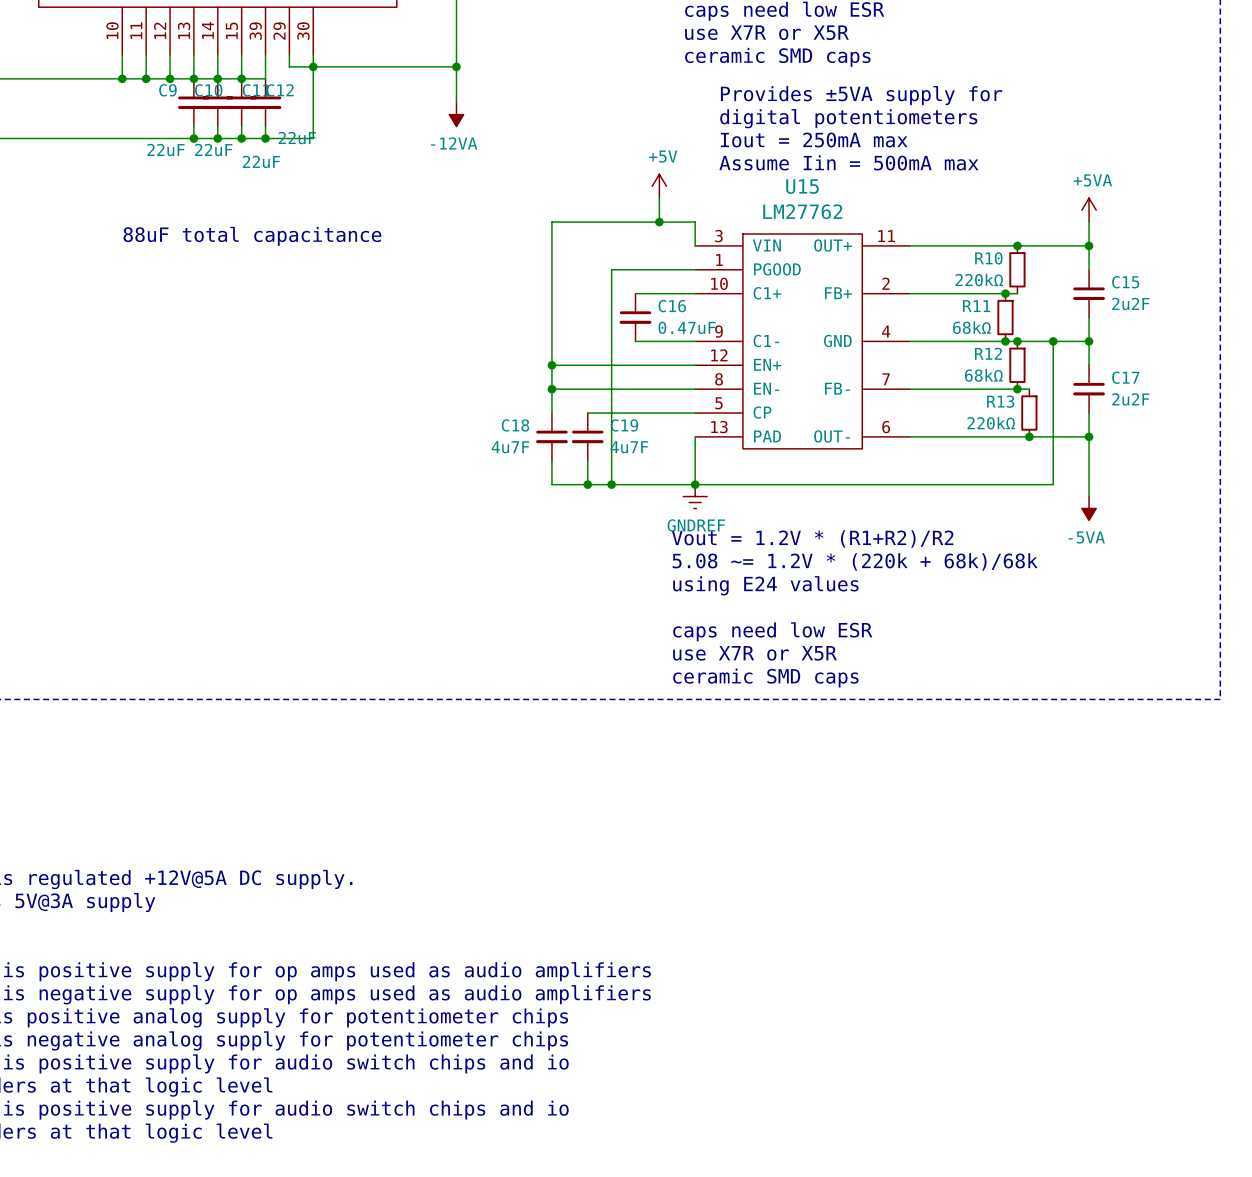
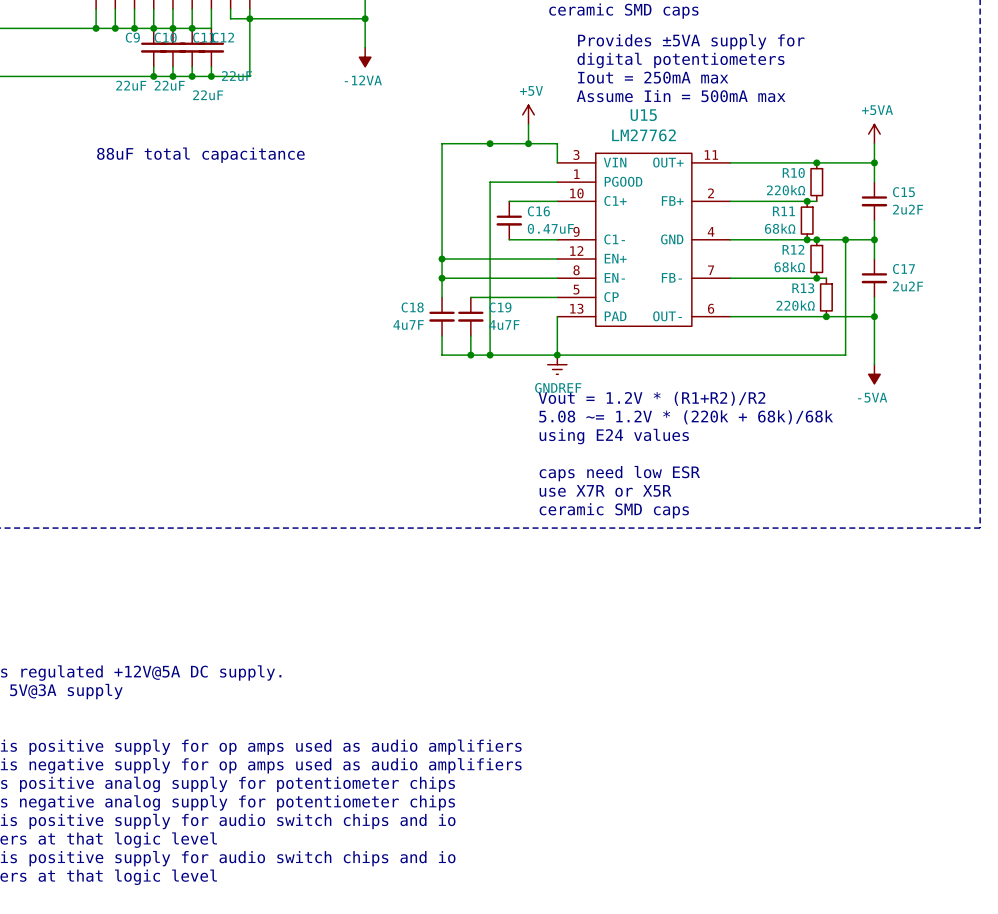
junction: none -> (490, 143)

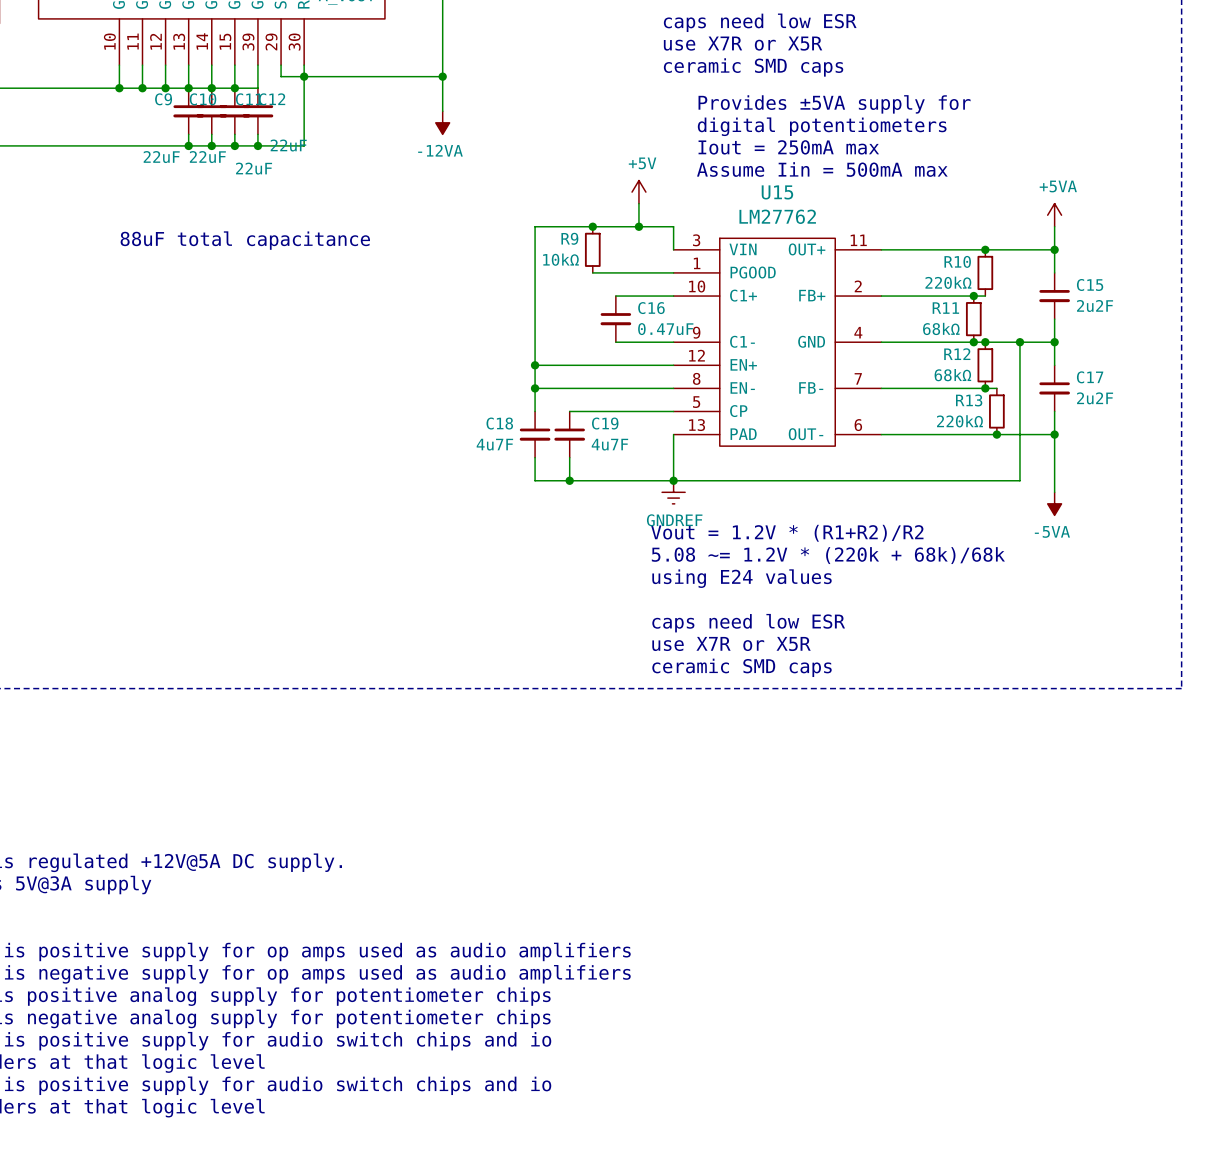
R9: none -> 10kΩ (592, 249)
wire: (490, 182) (490, 355) -> none
junction: (490, 355) -> none

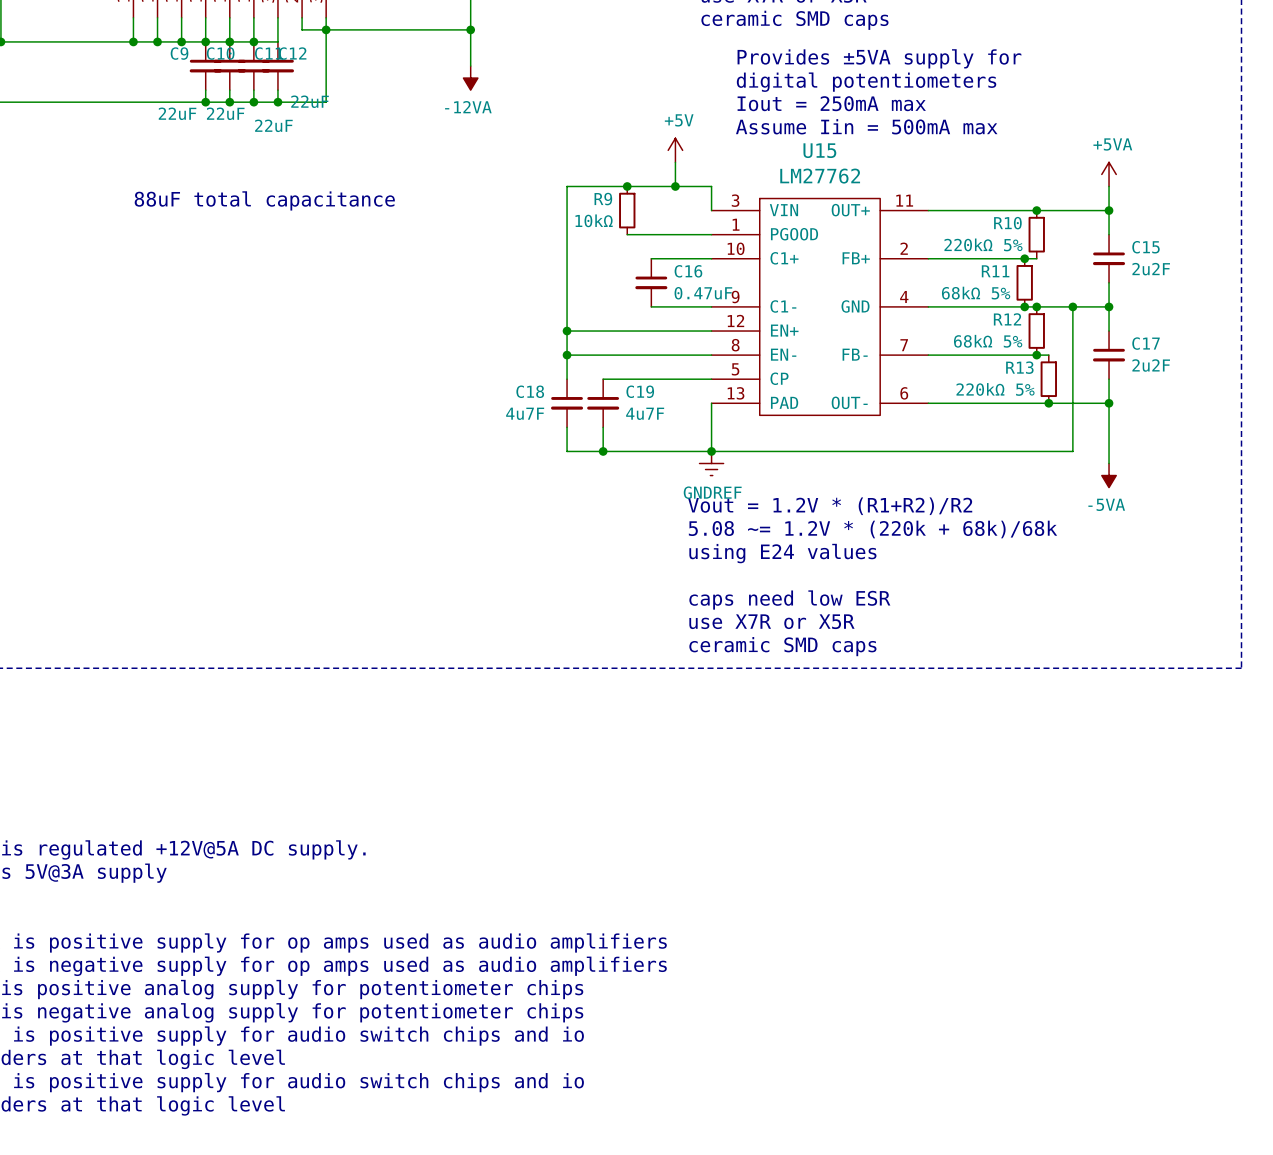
R10 value: 220kΩ (948, 282) -> 220kΩ 5% (983, 244)
R11 value: 68kΩ (941, 328) -> 68kΩ 5% (976, 293)
R12 value: 68kΩ (952, 375) -> 68kΩ 5% (988, 341)
R13 value: 220kΩ (959, 421) -> 220kΩ 5% (995, 389)

